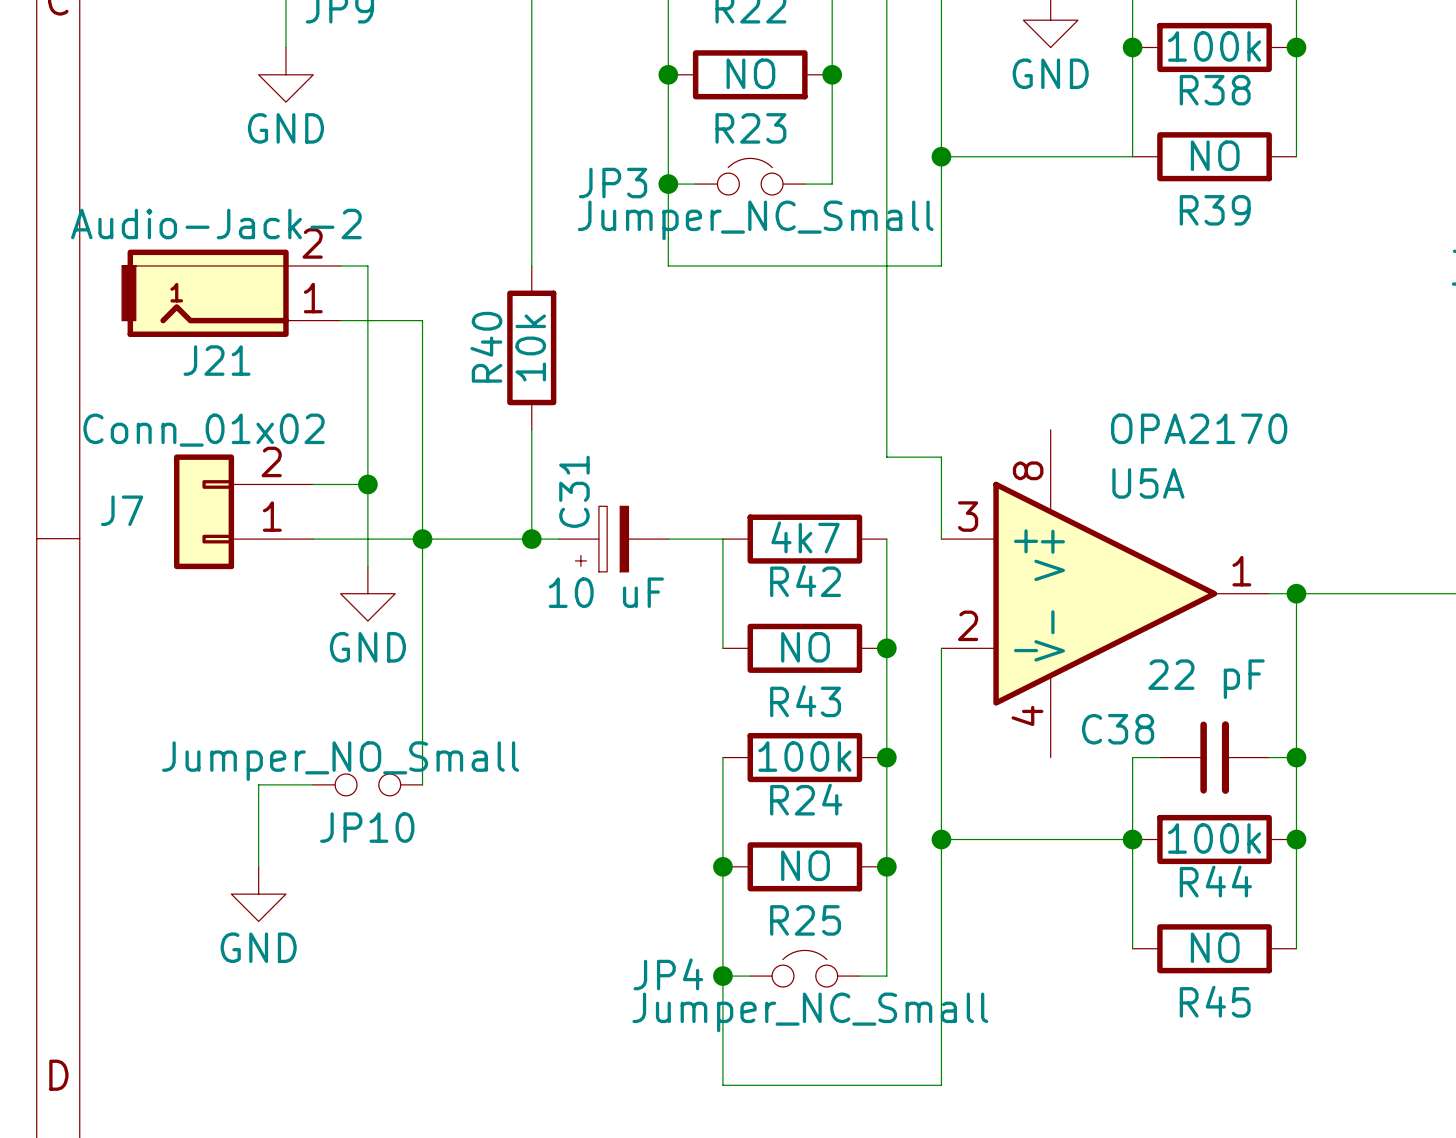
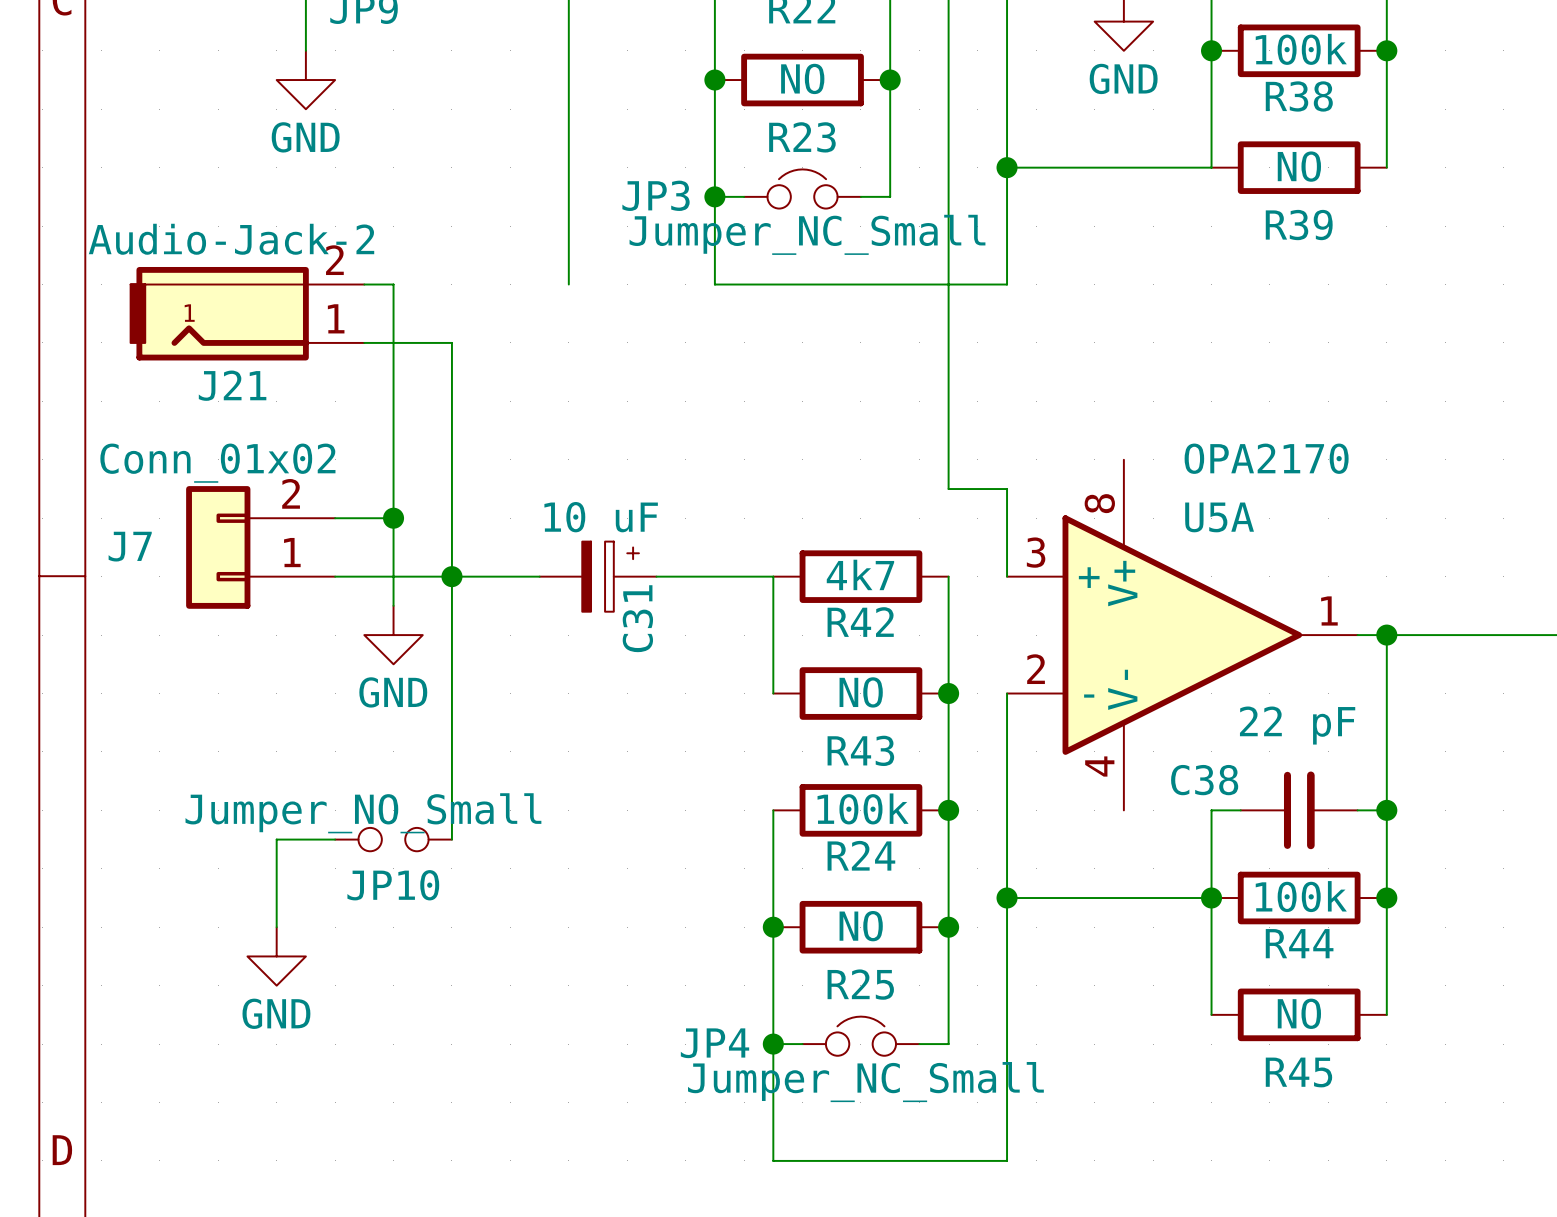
R40: 10k (531, 347) -> none
wire: (531, 429) (531, 539) -> none
junction: (531, 539) -> none
C31 rotation: 0° (601, 539) -> 180° (610, 576)

